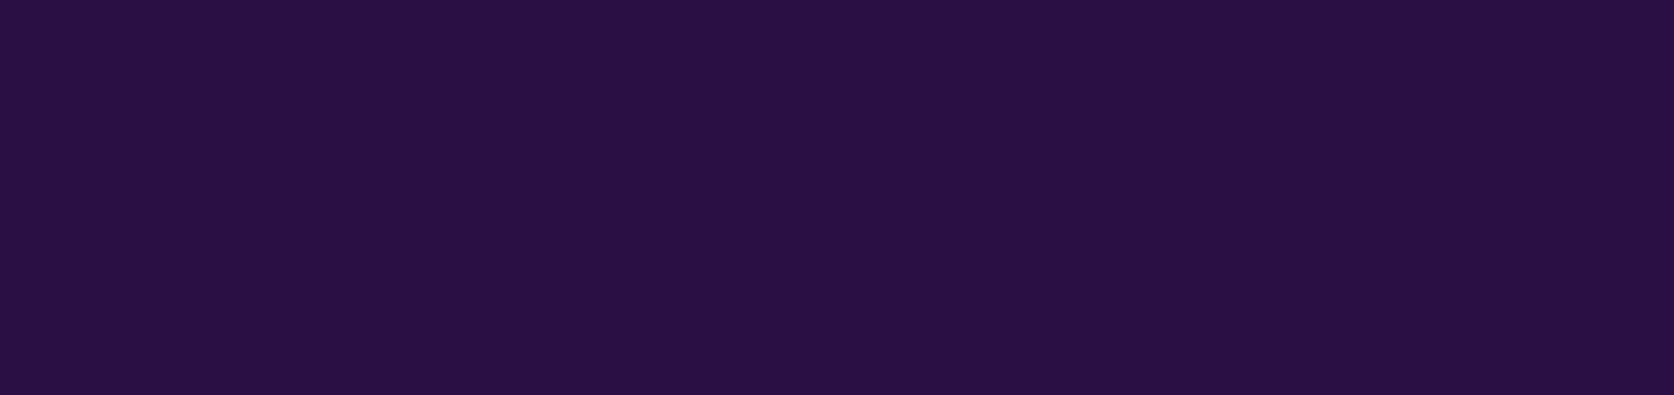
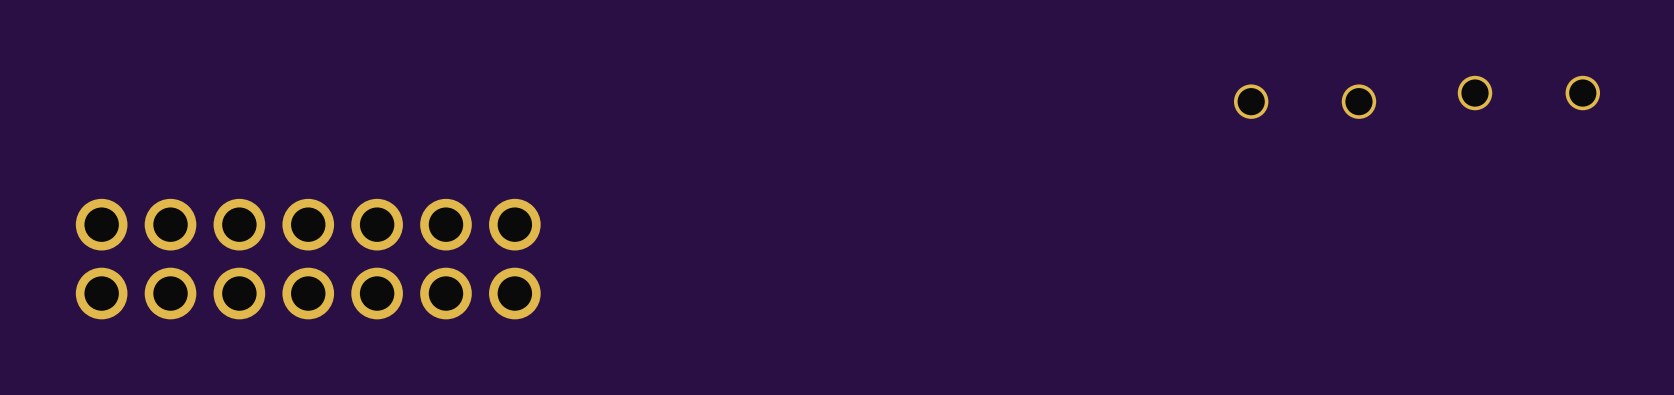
part: none -> (1528, 93)
part: none -> (1305, 101)
part: none -> (308, 259)

